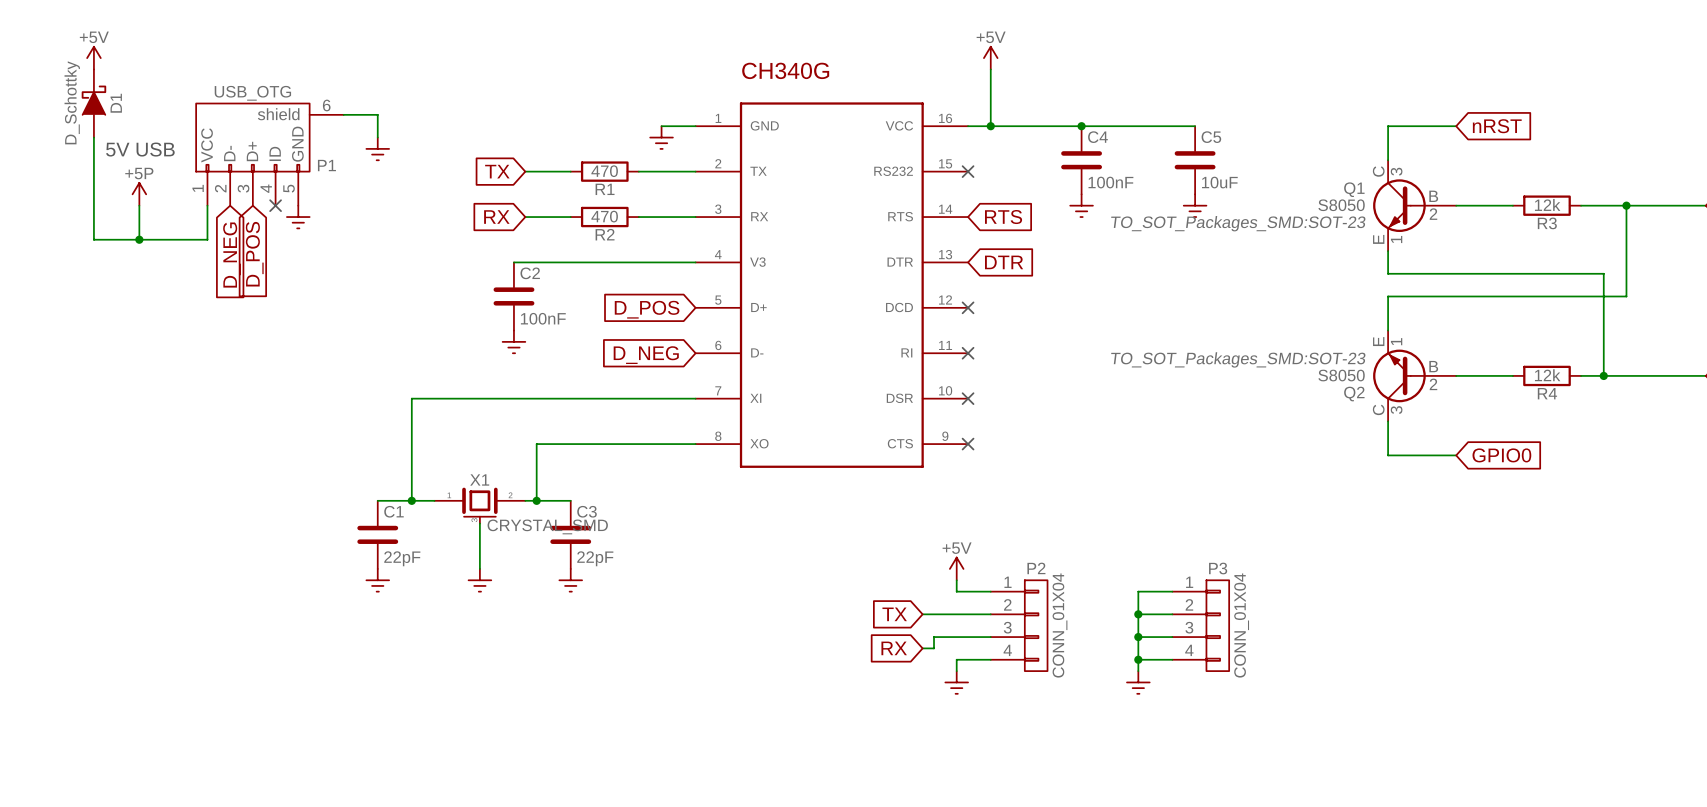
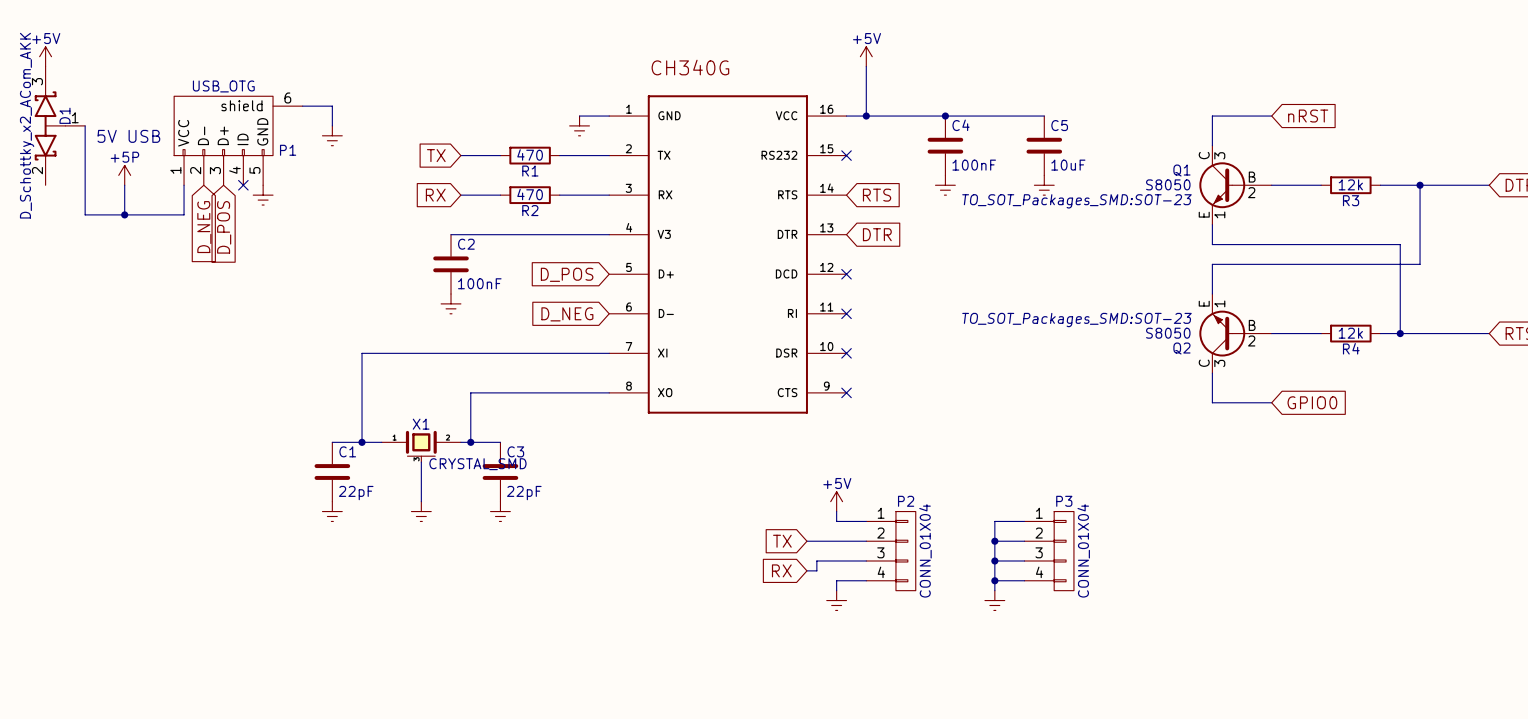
power symbol position: +5V (93, 58) -> +5V (45, 56)
D1 symbol: [81, 69, 107, 138] -> [34, 66, 86, 186]
D1 value: D_Schottky (72, 102) -> D_Schottky_x2_ACom_AKK (27, 125)
D1 name position: D1 (116, 103) -> D1 (65, 115)

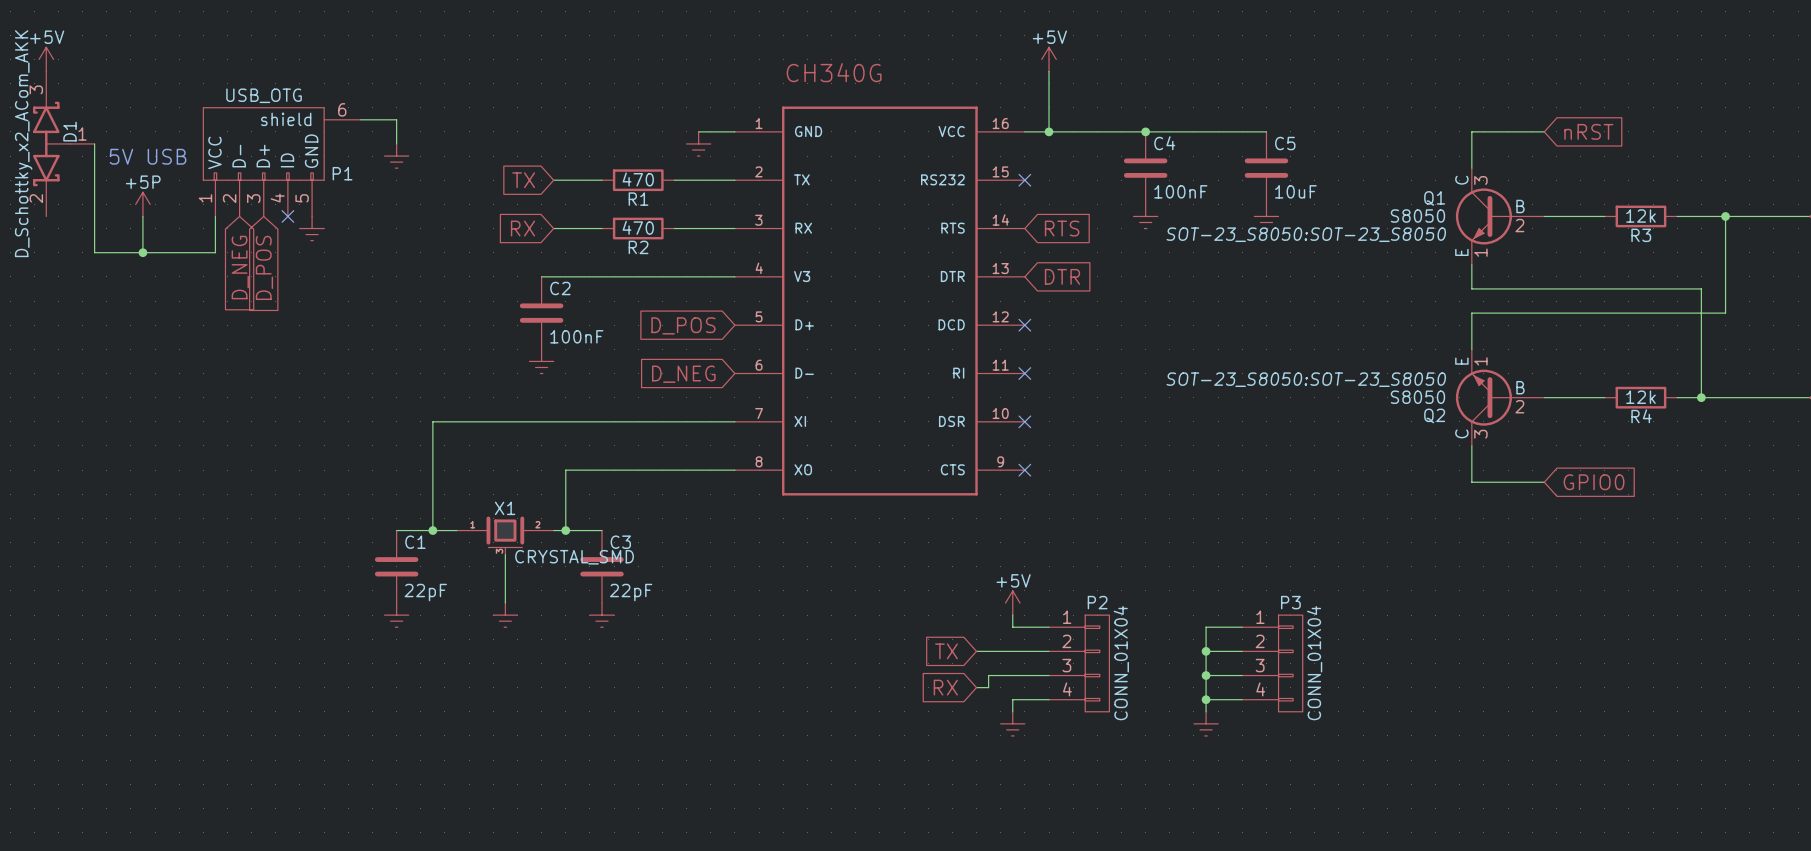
Q1 text: TO_SOT_Packages_SMD:SOT-23 (1077, 201) -> SOT-23_S8050:SOT-23_S8050 (1306, 234)
Q2 text: TO_SOT_Packages_SMD:SOT-23 (1077, 320) -> SOT-23_S8050:SOT-23_S8050 (1306, 379)

